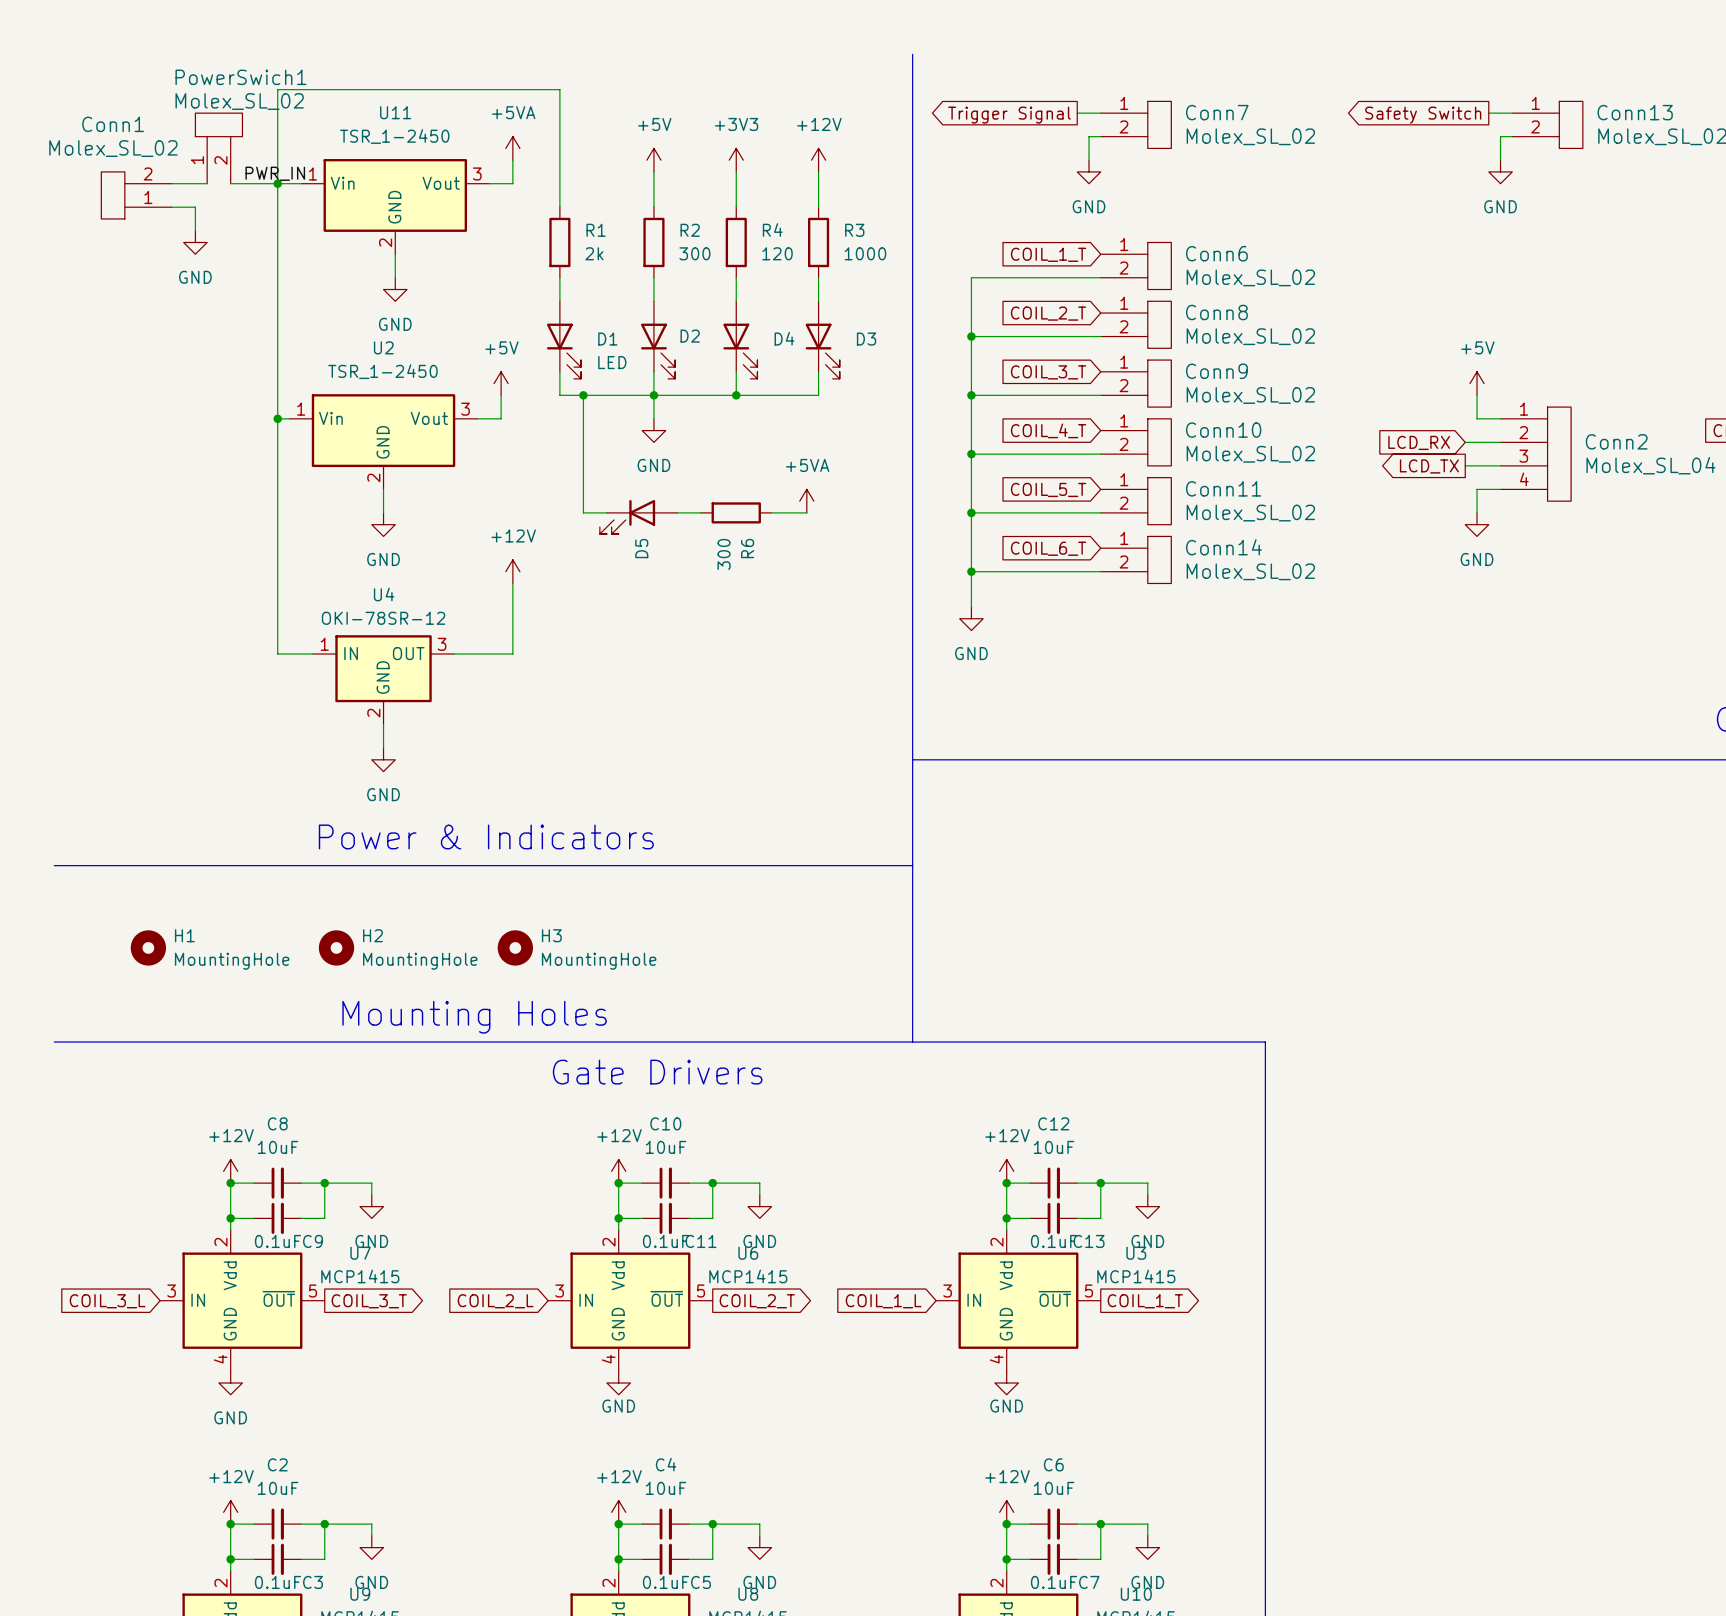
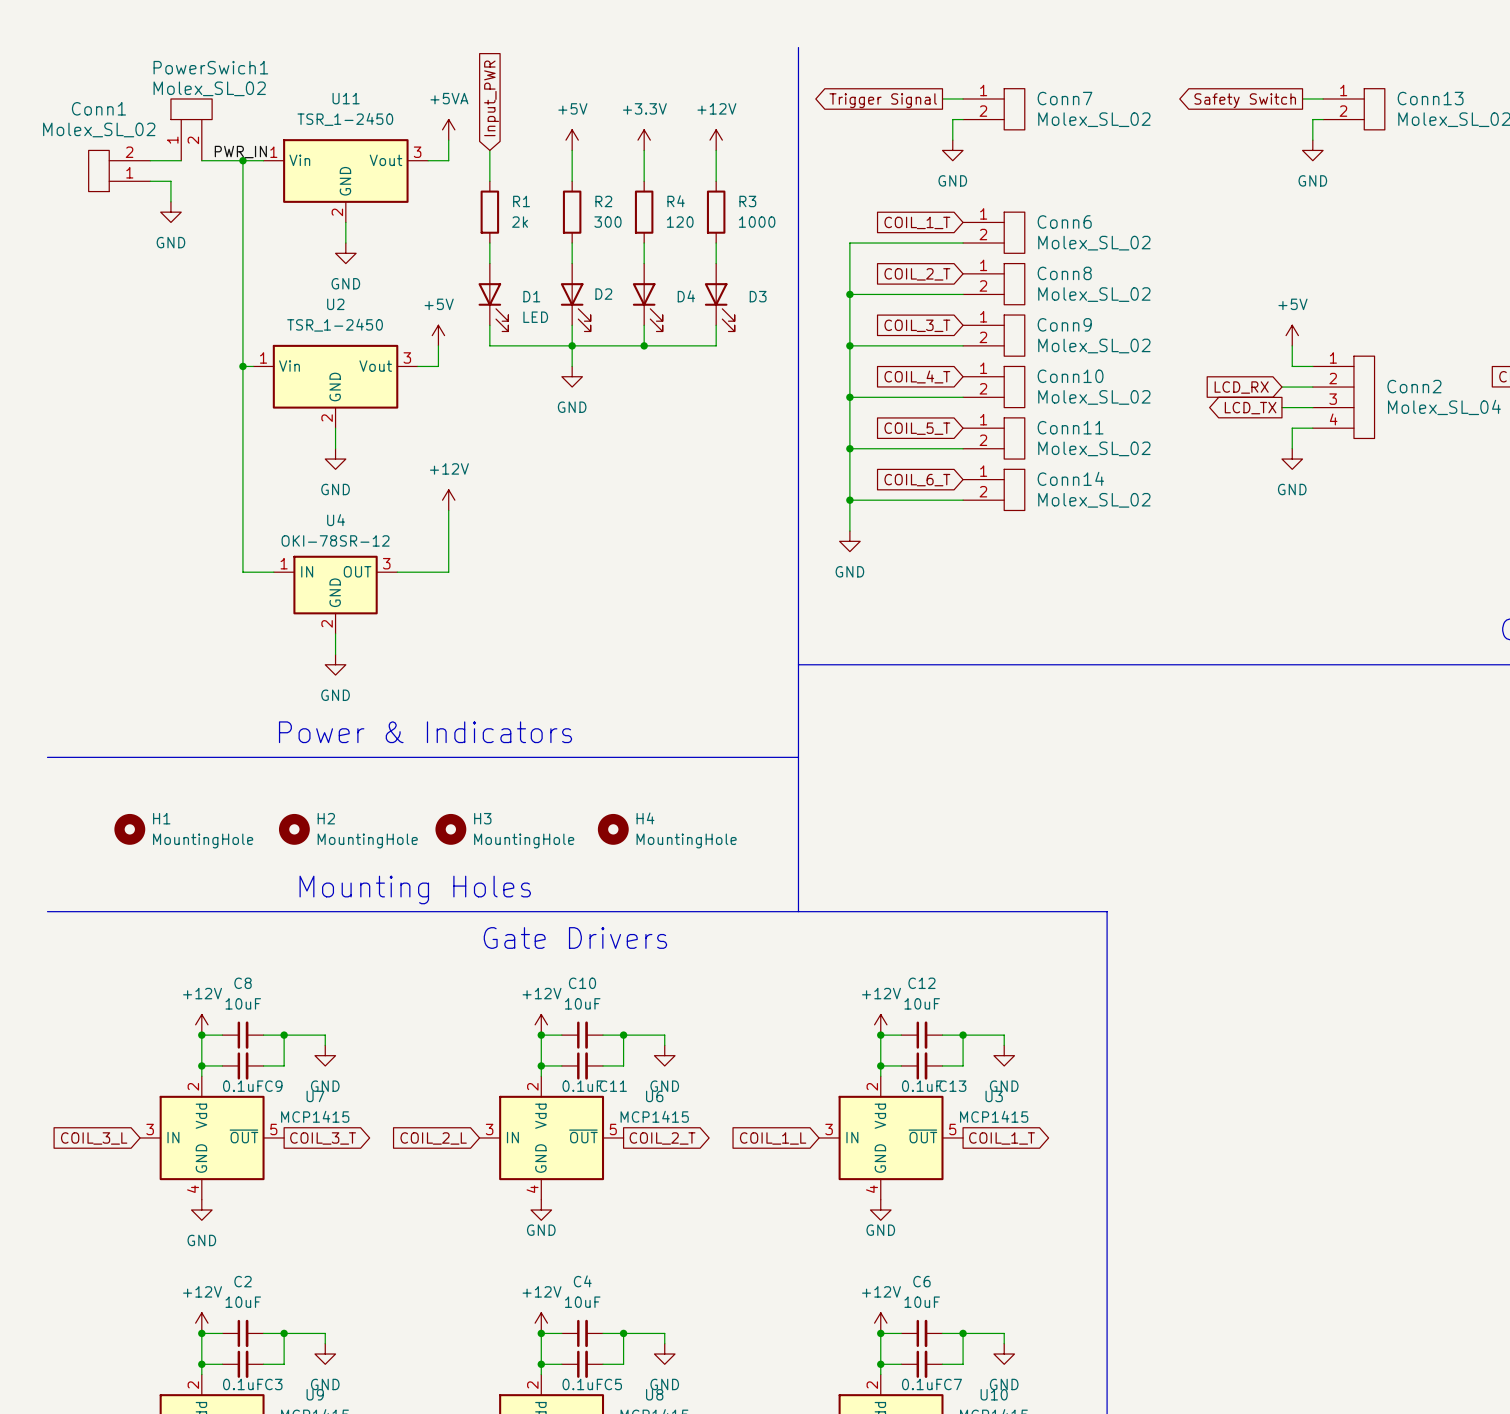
global label: none -> Input_PWR (491, 98)
power symbol: +3V3 (736, 160) -> +3.3V (644, 140)
wire: (559, 171) (559, 89) (277, 89) (277, 183) -> none
wire: (583, 395) (583, 512) (606, 512) -> none
junction: (583, 395) -> none
power symbol: +5VA (806, 501) -> none
wire: (677, 512) (700, 512) -> none
R6: 300 (736, 512) -> none
wire: (771, 512) (806, 512) -> none
D5: (638, 517) -> none
H4: none -> MountingHole (613, 829)

